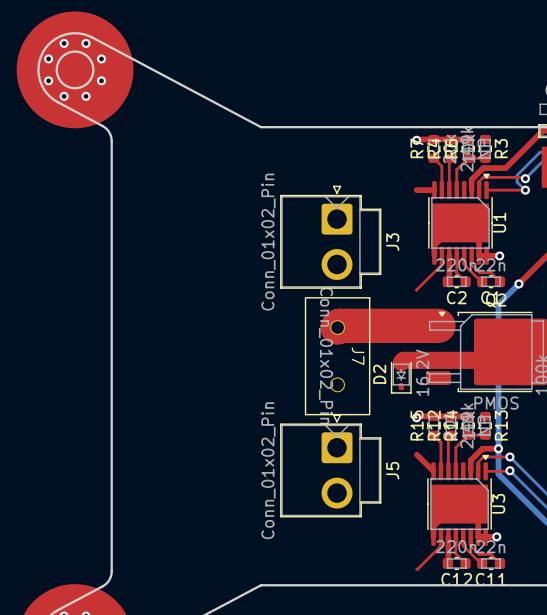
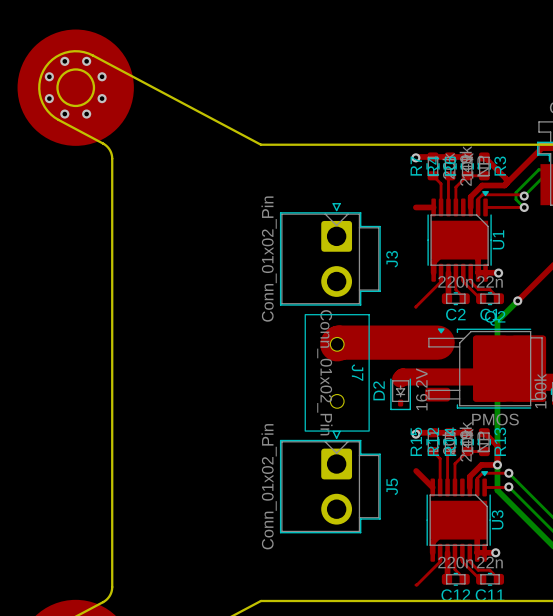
top track: none -> (484, 156) (506, 179) (506, 183)
top track: none -> (484, 432) (497, 445) (497, 464)

